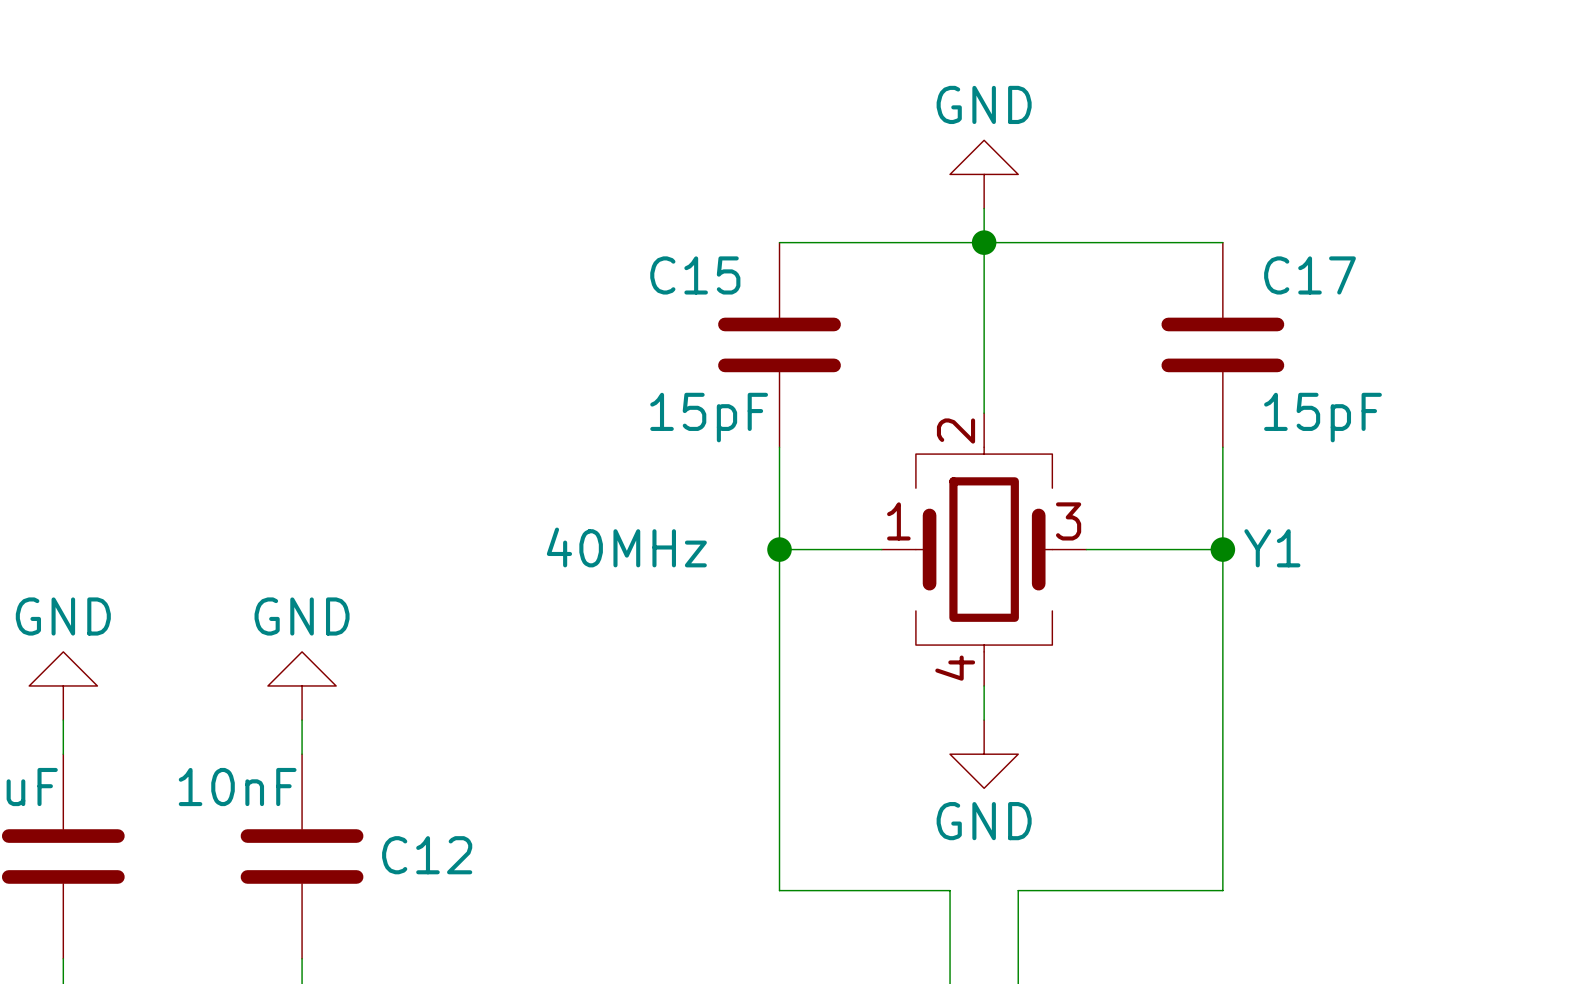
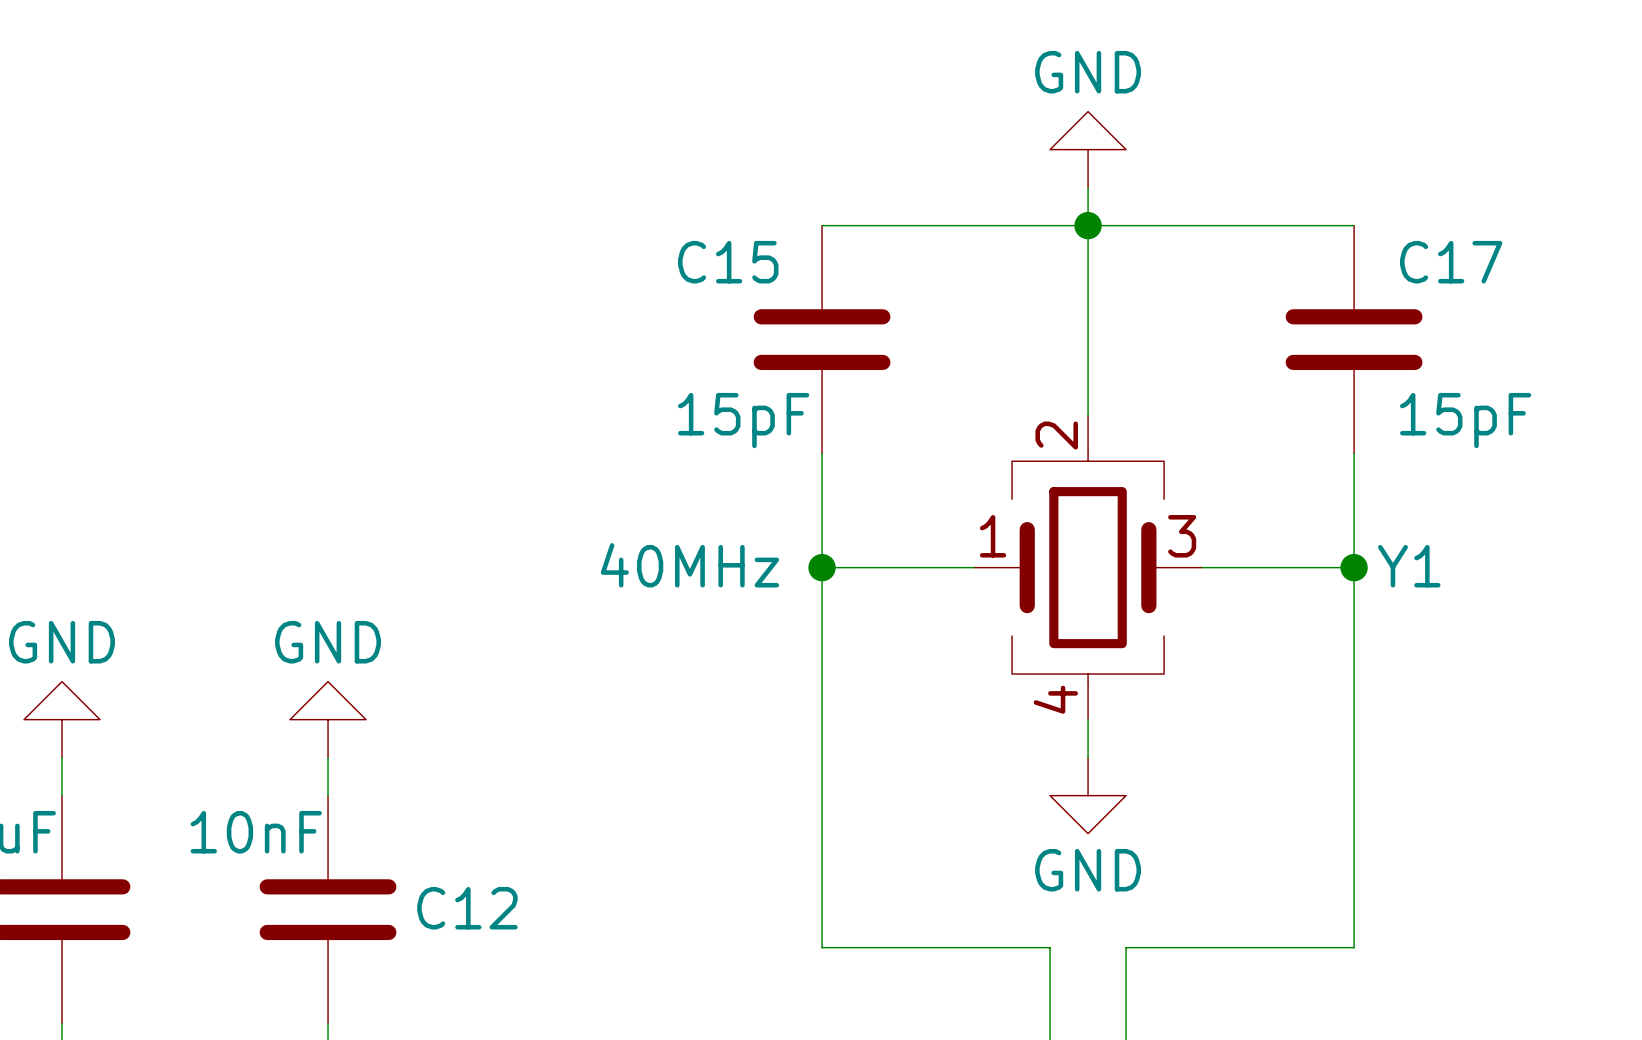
wire: none -> (822, 225) (860, 225)
C15 position: (779, 344) -> (822, 339)
wire: (779, 447) (779, 890) -> (822, 453) (822, 947) (860, 947)
wire: none -> (822, 567) (860, 567)
junction position: (779, 549) -> (822, 567)

